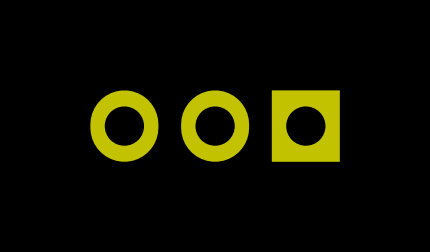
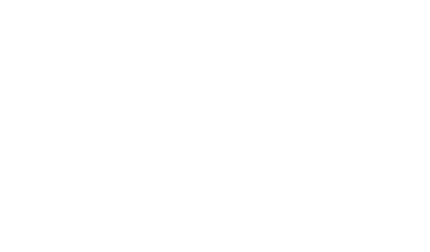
part: (215, 126) -> none

